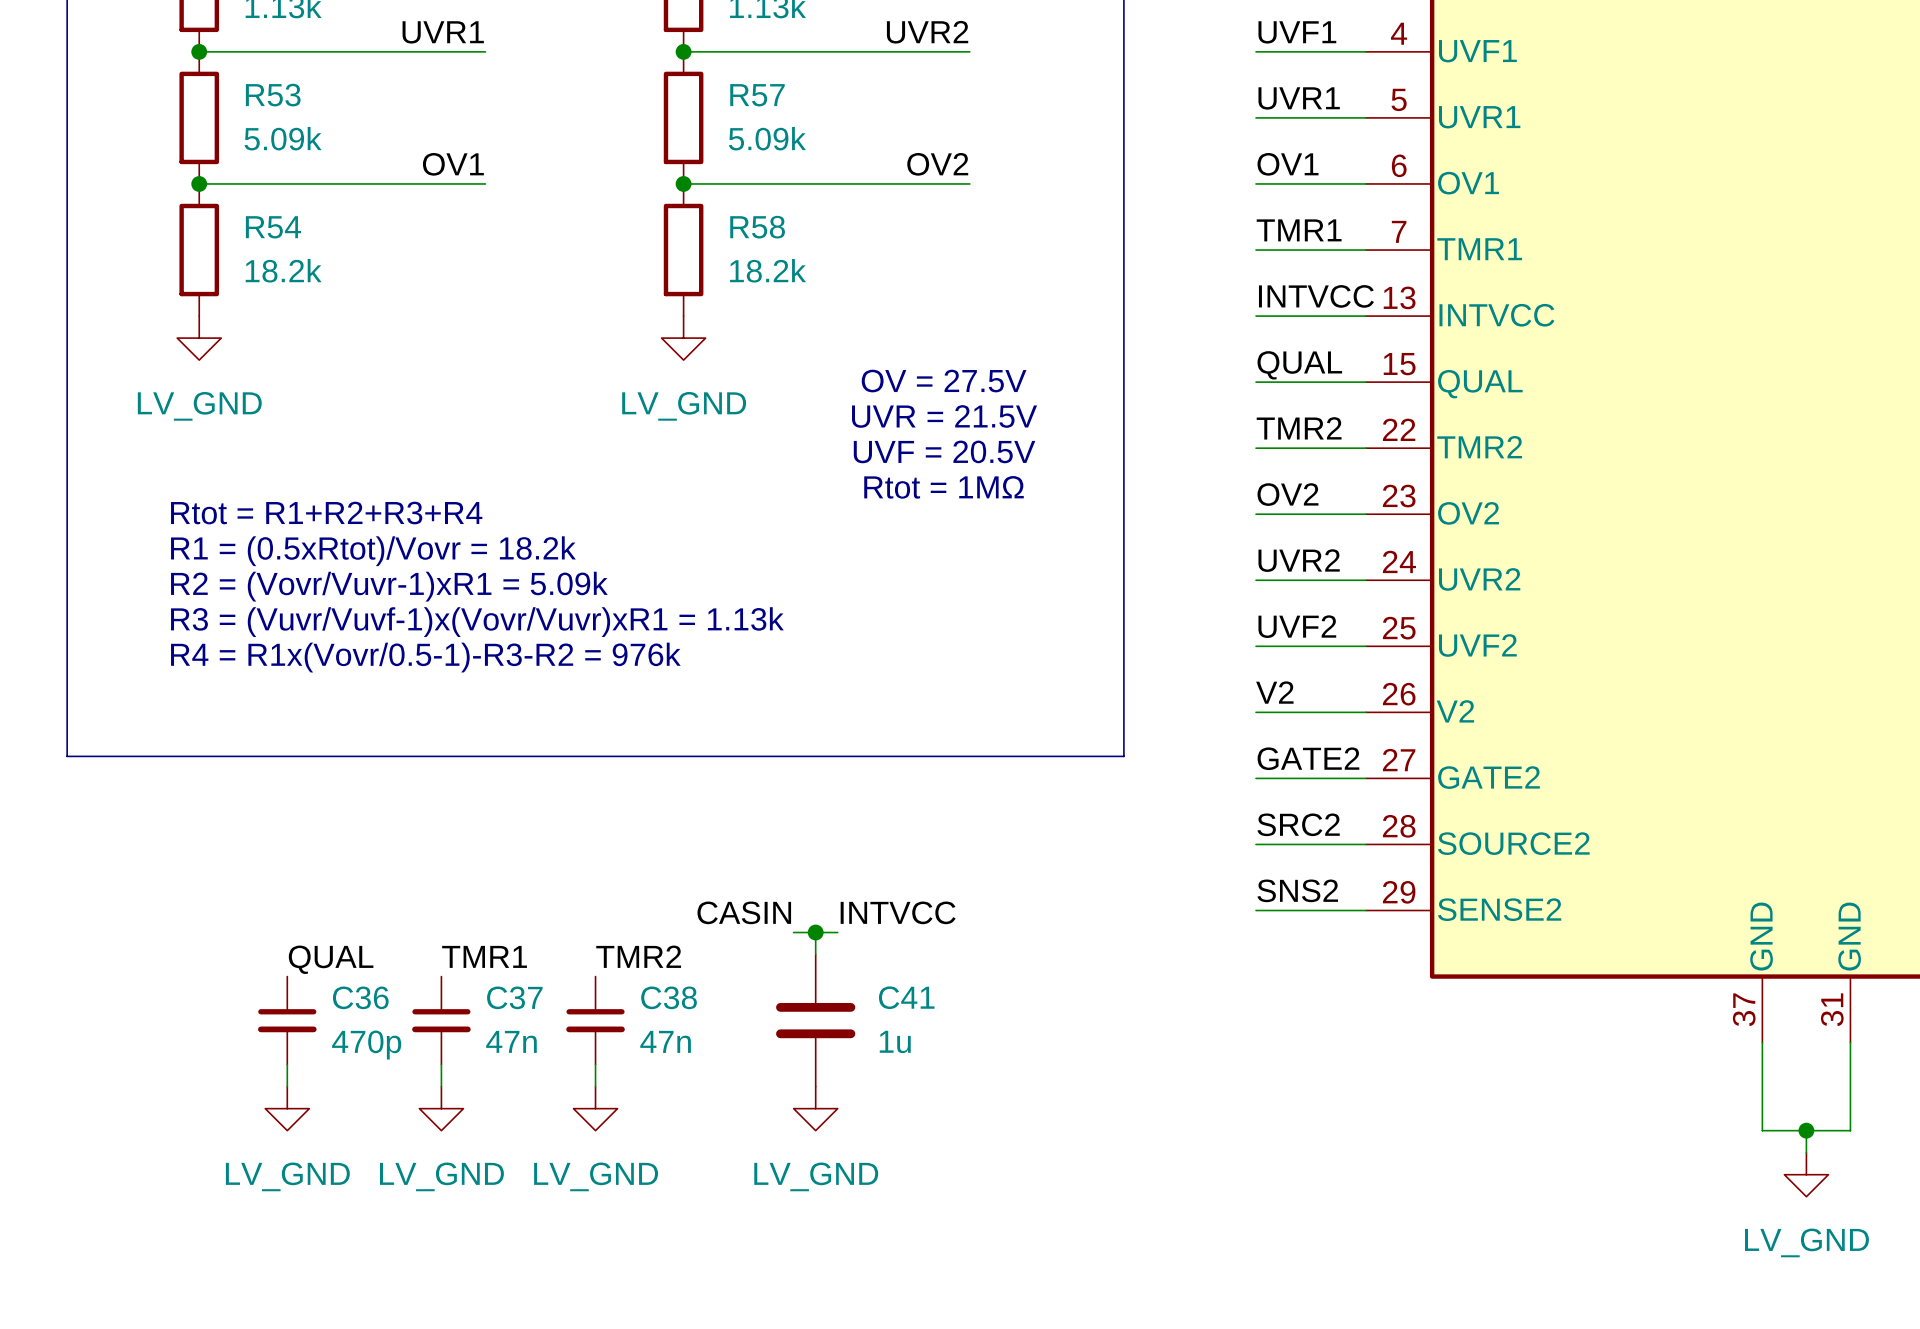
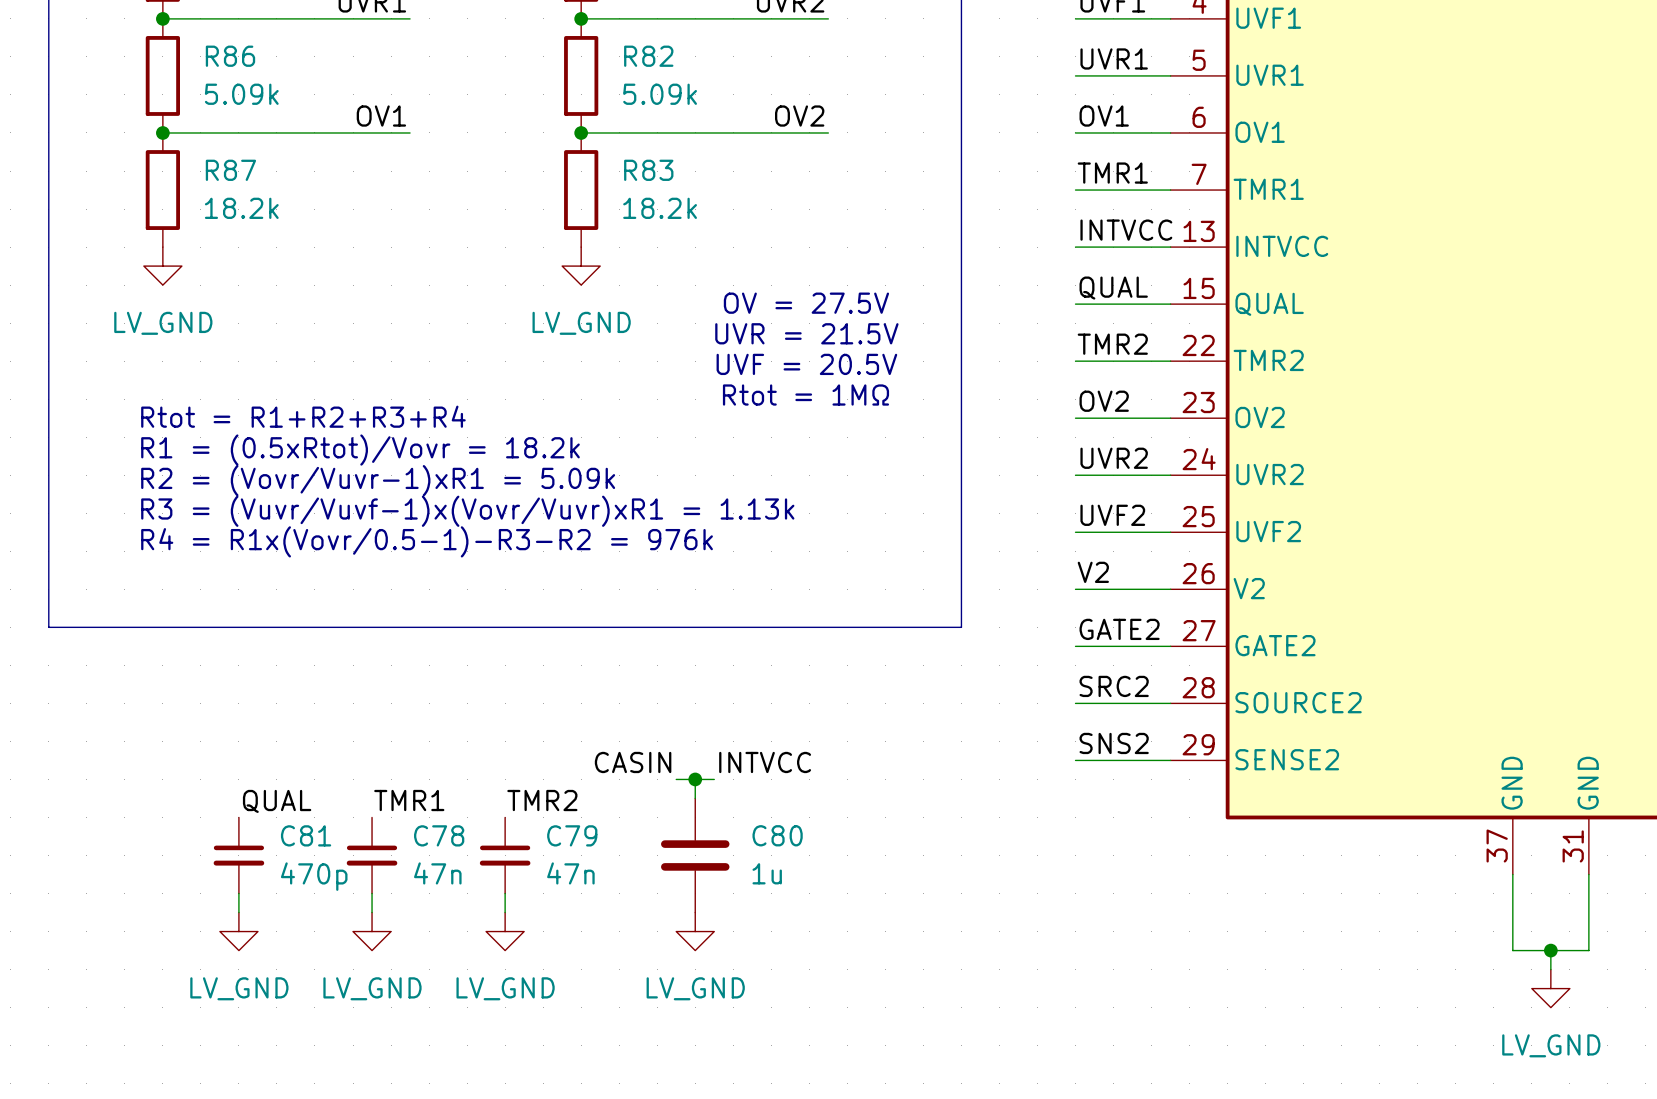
R53 name: R53 (273, 95) -> R86 (230, 56)
R57 name: R57 (757, 95) -> R82 (648, 56)
R54 name: R54 (273, 227) -> R87 (230, 170)
R58 name: R58 (757, 227) -> R83 (648, 170)
C36 name: C36 (360, 997) -> C81 (306, 835)
C37 name: C37 (514, 997) -> C78 (439, 835)
C38 name: C38 (669, 997) -> C79 (572, 835)
C41 name: C41 (906, 997) -> C80 (777, 835)

